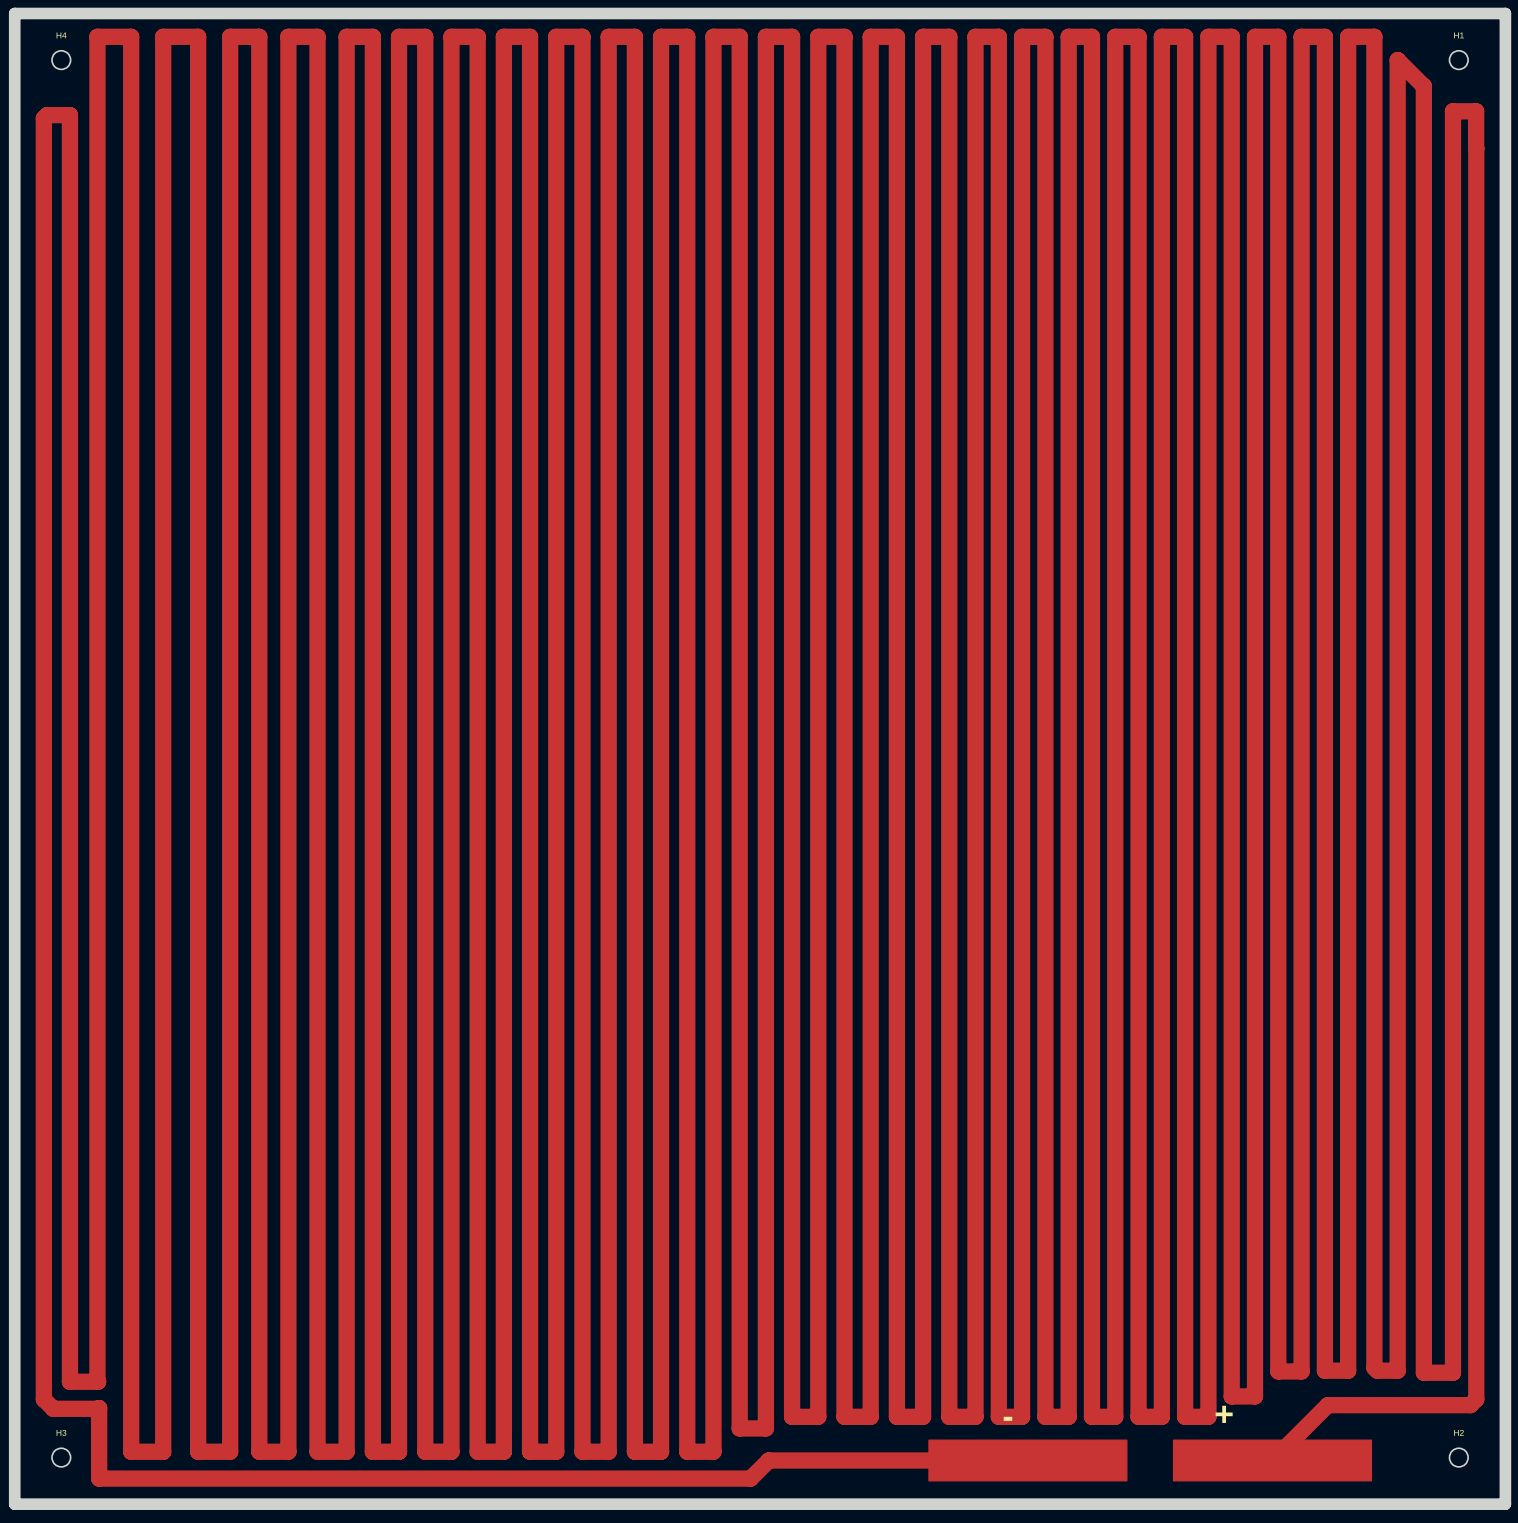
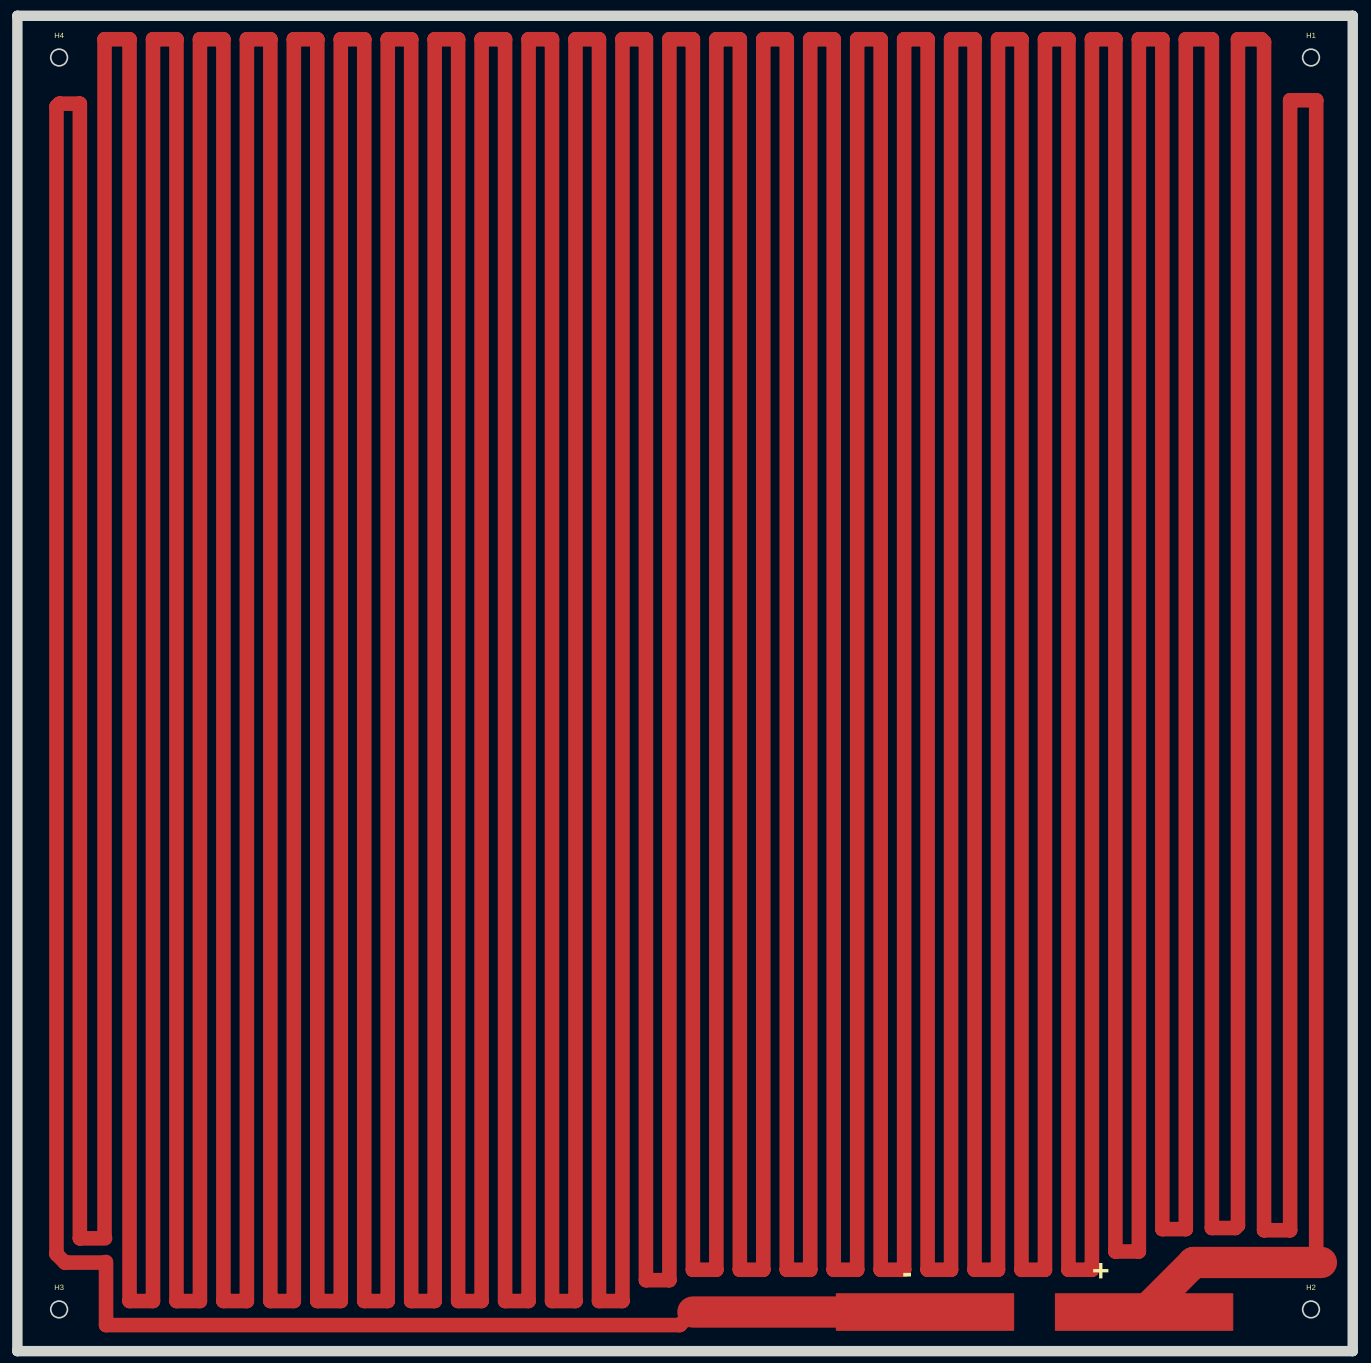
top track: (1161, 39) (1161, 36) (1185, 36) (1185, 1416) (1208, 1416) (1208, 36) (1231, 36) (1231, 1396) (1255, 1396) (1255, 36) (1278, 36) (1278, 1371) (1301, 1371) (1301, 36) (1324, 36) (1324, 1370) (1348, 1370) (1348, 1366) -> (1044, 39) (1068, 39) (1068, 1269) (1091, 1269) (1091, 39) (1115, 39) (1115, 1251) (1138, 1251) (1138, 39) (1162, 39) (1162, 1229) (1185, 1229) (1185, 39) (1211, 39)
top track: (1348, 39) (1348, 36) (1374, 36) (1374, 1367) (1377, 1370) (1397, 1370) (1397, 60) (1423, 86) (1423, 1372) (1452, 1372) (1452, 111) (1476, 111) (1476, 1399) (1470, 1405) -> none
top track: none -> (1211, 1228) (1235, 1228) (1237, 1225) (1237, 39) (1261, 39) (1264, 41) (1264, 1230) (1290, 1230) (1290, 100) (1316, 100) (1316, 1260) (1313, 1262)
top track: none -> (105, 1238) (79, 1238) (79, 103) (59, 103) (56, 106) (56, 1254) (64, 1262) (105, 1262)
top track: none -> (106, 1261) (106, 1325) (679, 1325)
top track width: thin (1470, 1405) (1327, 1405) (1272, 1460) -> thick (1321, 1262) (1193, 1262) (1144, 1312)
top track: (1161, 1413) (1161, 1416) (1138, 1416) (1138, 36) (1115, 36) (1115, 1416) (1091, 1416) (1091, 36) (1068, 36) (1068, 1416) (1045, 1416) (1045, 36) (1022, 36) (1022, 1416) (998, 1416) (998, 36) (975, 36) (975, 1416) (949, 1416) (949, 36) (923, 36) (923, 1416) (896, 1416) (896, 36) (870, 36) (870, 1416) (844, 1416) (844, 36) (818, 36) (818, 1416) (792, 1416) (792, 36) (765, 36) (765, 1428) (739, 1428) (739, 36) (713, 36) (713, 1451) (687, 1451) (687, 36) (661, 36) (661, 1451) (634, 1451) (634, 36) (608, 36) (608, 1451) (582, 1451) (582, 36) (556, 36) (556, 1451) (530, 1451) (530, 36) (503, 36) (503, 1451) (477, 1451) (477, 36) (451, 36) (451, 1451) (425, 1451) (425, 36) (399, 36) (399, 1451) (372, 1451) (372, 36) (346, 36) (346, 1451) (317, 1451) (317, 36) (288, 36) (288, 1451) (259, 1451) (259, 36) (230, 36) (230, 1451) (198, 1451) (198, 36) (163, 36) (163, 1451) (131, 1451) (131, 36) (97, 36) (98, 1381) (69, 1381) (69, 115) (47, 115) (43, 118) (43, 1399) (53, 1408) (99, 1408) (99, 1478) (750, 1478) (754, 1475) -> (1044, 1269) (1021, 1269) (1021, 39) (998, 39) (998, 1269) (974, 1269) (974, 39) (951, 39) (951, 1269) (927, 1269) (927, 39) (904, 39) (904, 1269) (880, 1269) (880, 39) (857, 39) (857, 1269) (833, 1269) (833, 39) (810, 39) (810, 1269) (786, 1269) (786, 39) (763, 39) (763, 1269) (739, 1269) (739, 39) (716, 39) (716, 1269) (692, 1269) (692, 39) (669, 39) (669, 1280) (645, 1280) (645, 39) (622, 39) (622, 1301) (598, 1301) (598, 39) (575, 39) (575, 1301) (552, 1301) (552, 39) (528, 39) (528, 1301) (505, 1301) (505, 39) (481, 39) (481, 1301) (458, 1301) (458, 39) (434, 39) (434, 1301) (411, 1301) (411, 39) (387, 39) (387, 1301) (364, 1301) (364, 39) (340, 39) (340, 1301) (317, 1301) (317, 39) (293, 39) (293, 1301) (270, 1301) (270, 39) (246, 39) (246, 1301) (223, 1301) (223, 39) (199, 39) (199, 1301) (176, 1301) (176, 39) (152, 39) (152, 1301) (129, 1301) (129, 39) (104, 39) (104, 1237)
top track width: thin (768, 1460) (1027, 1460) -> thick (692, 1312) (924, 1312)

